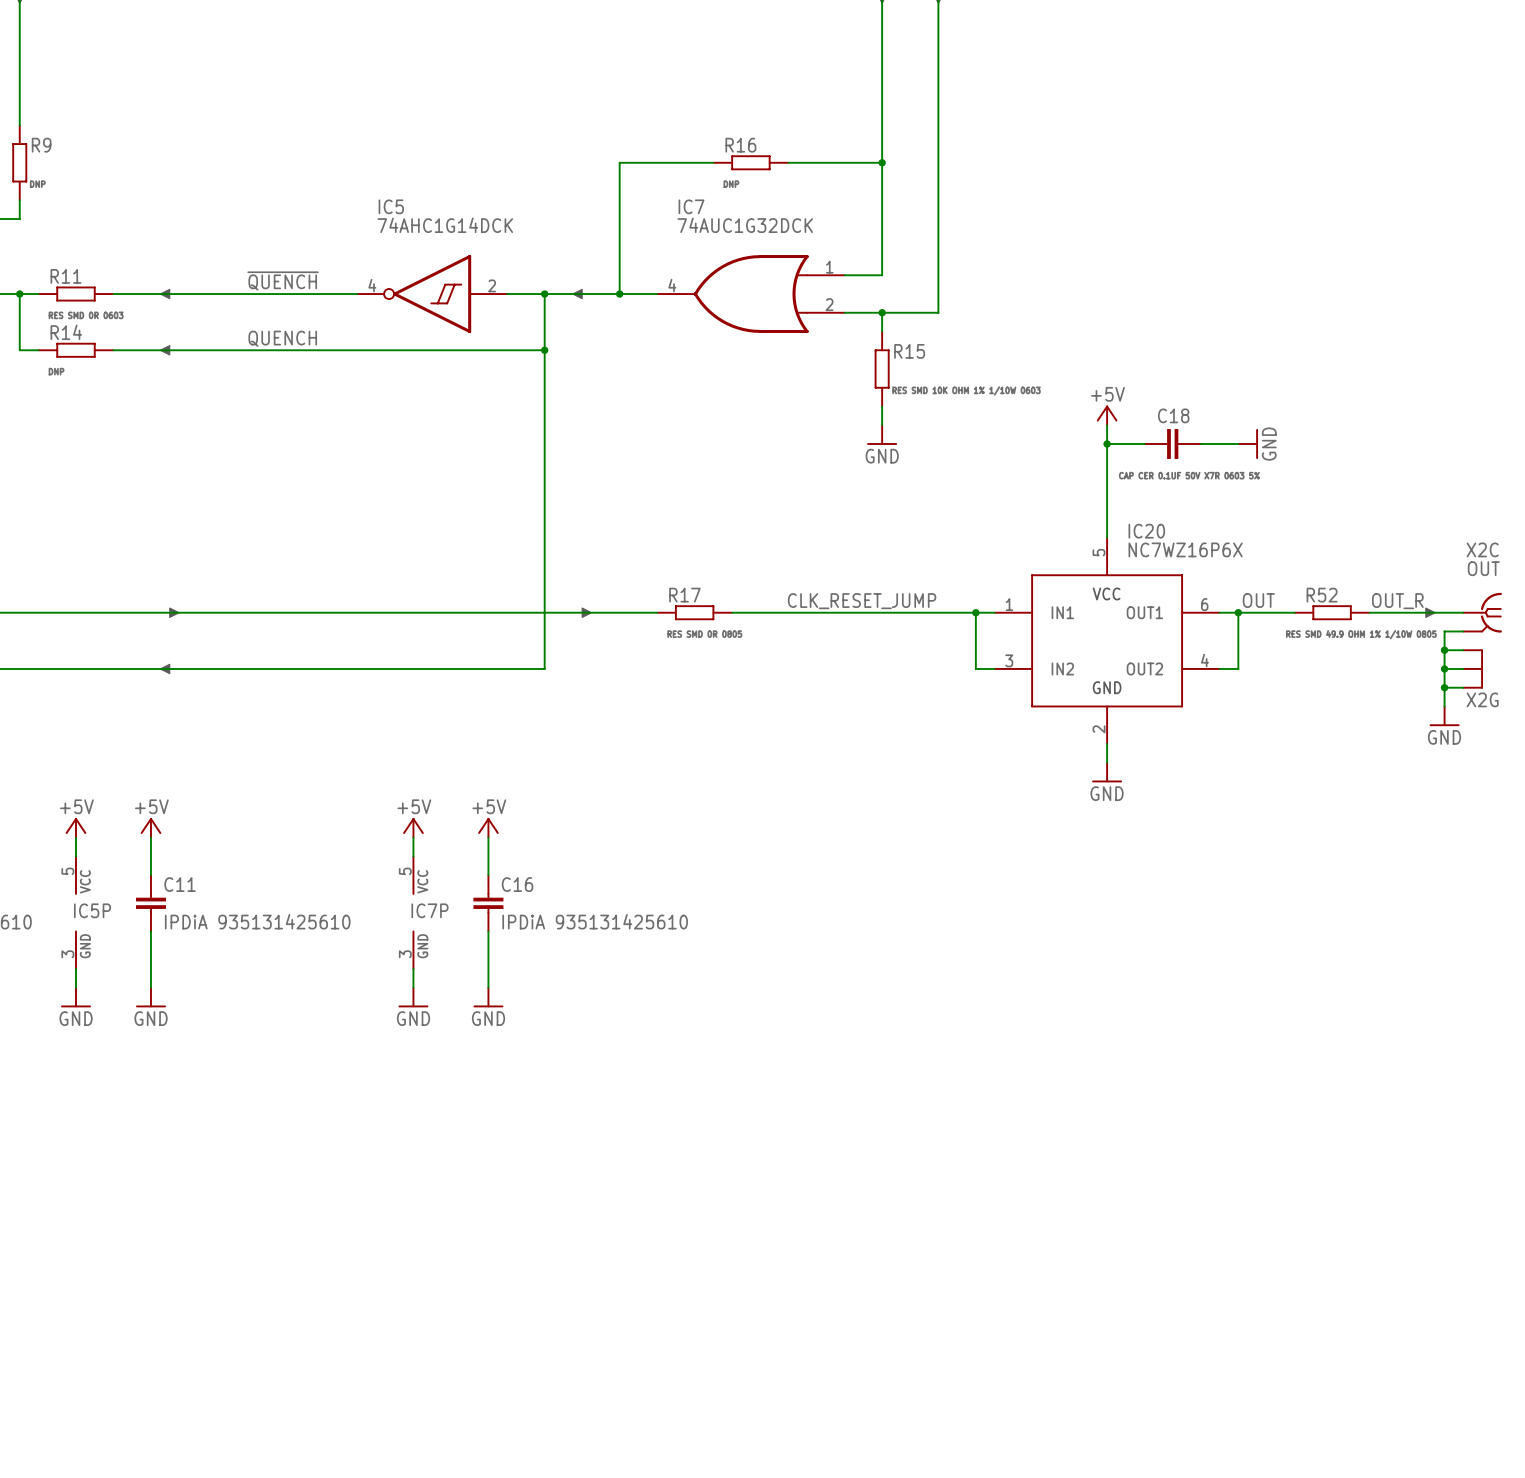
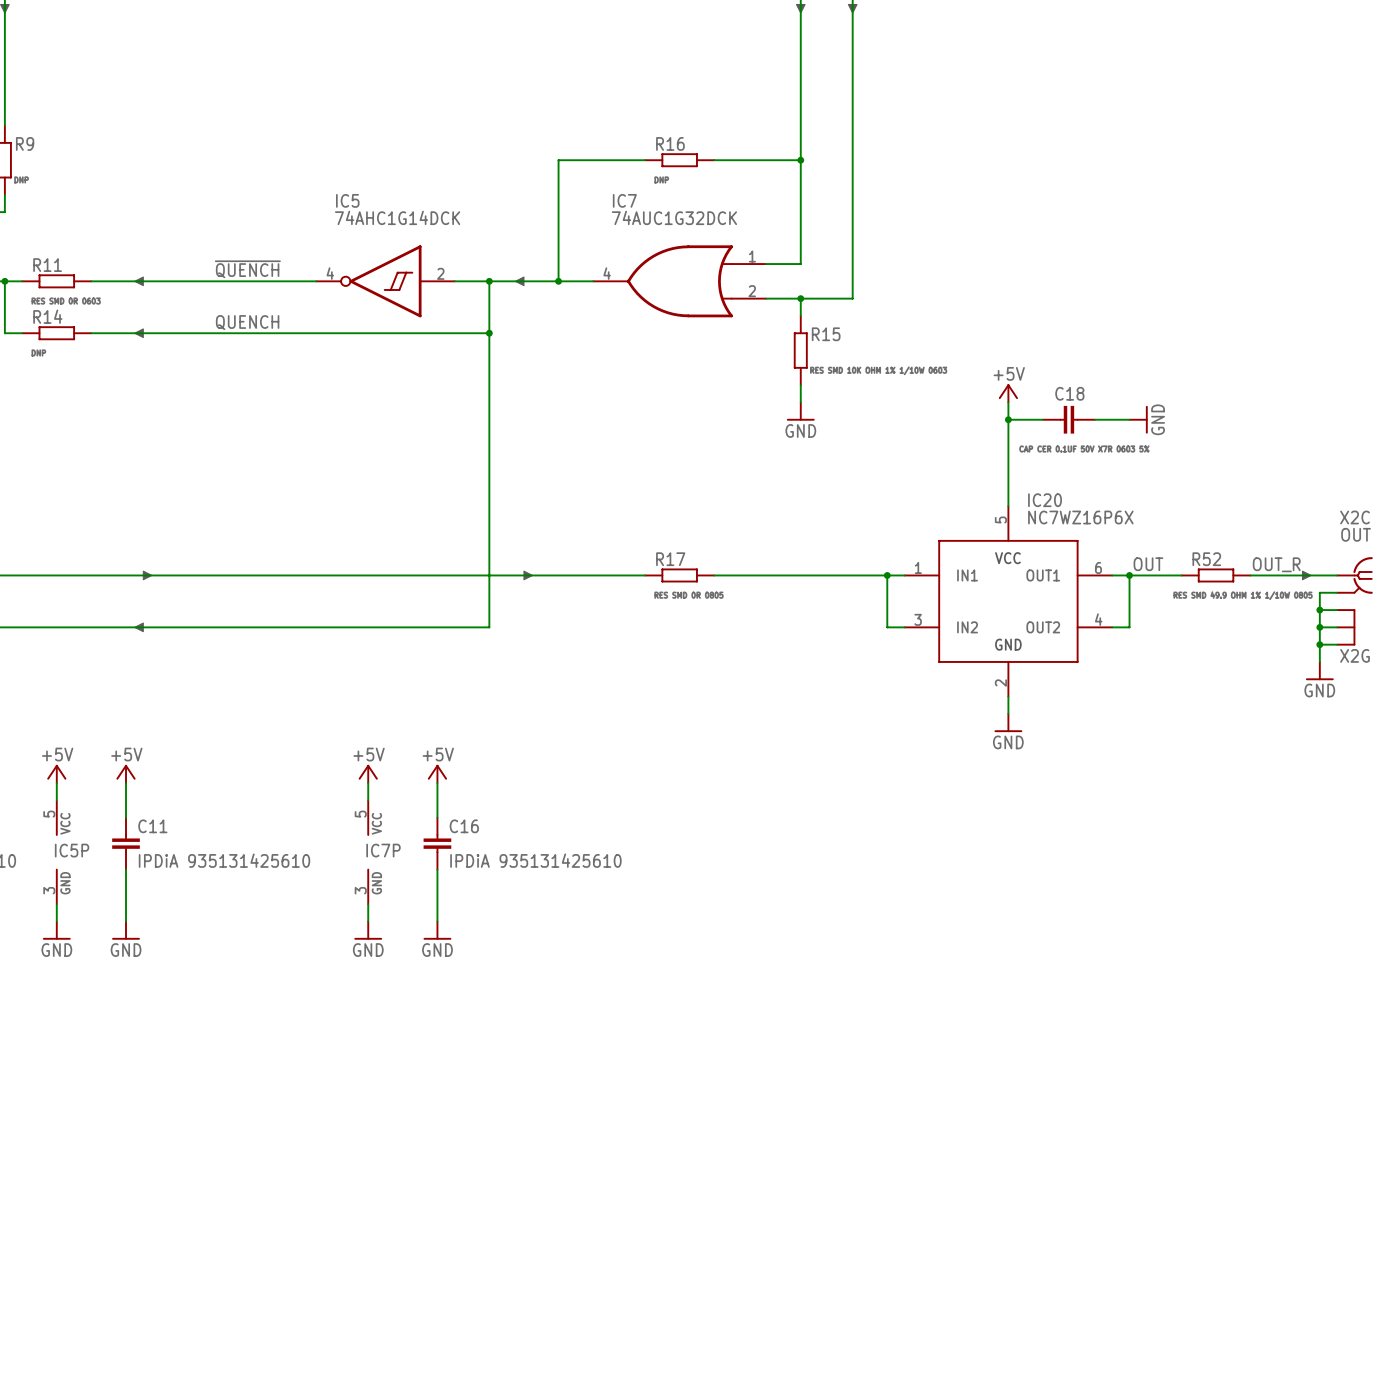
label: CLK_RESET_JUMP (862, 601) -> none
R17 position: (694, 612) -> (679, 575)
wire: (732, 612) (788, 612) -> (593, 575) (645, 575)

